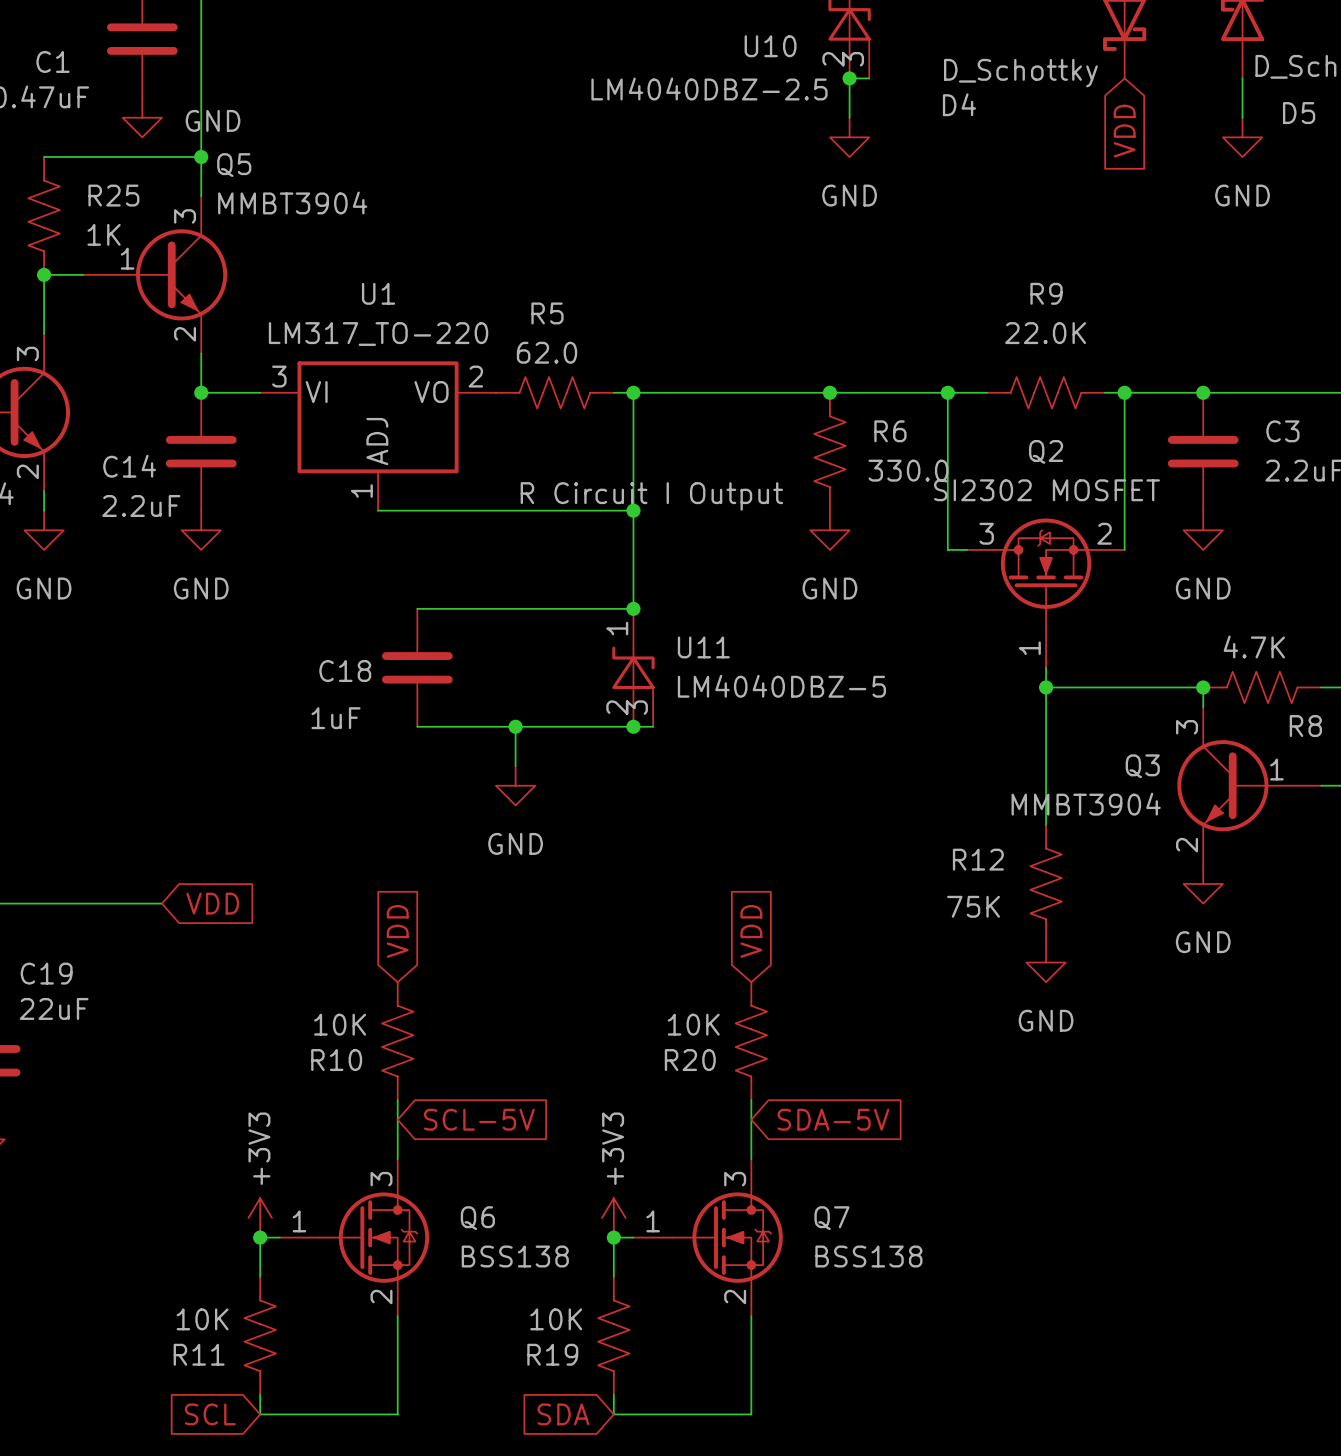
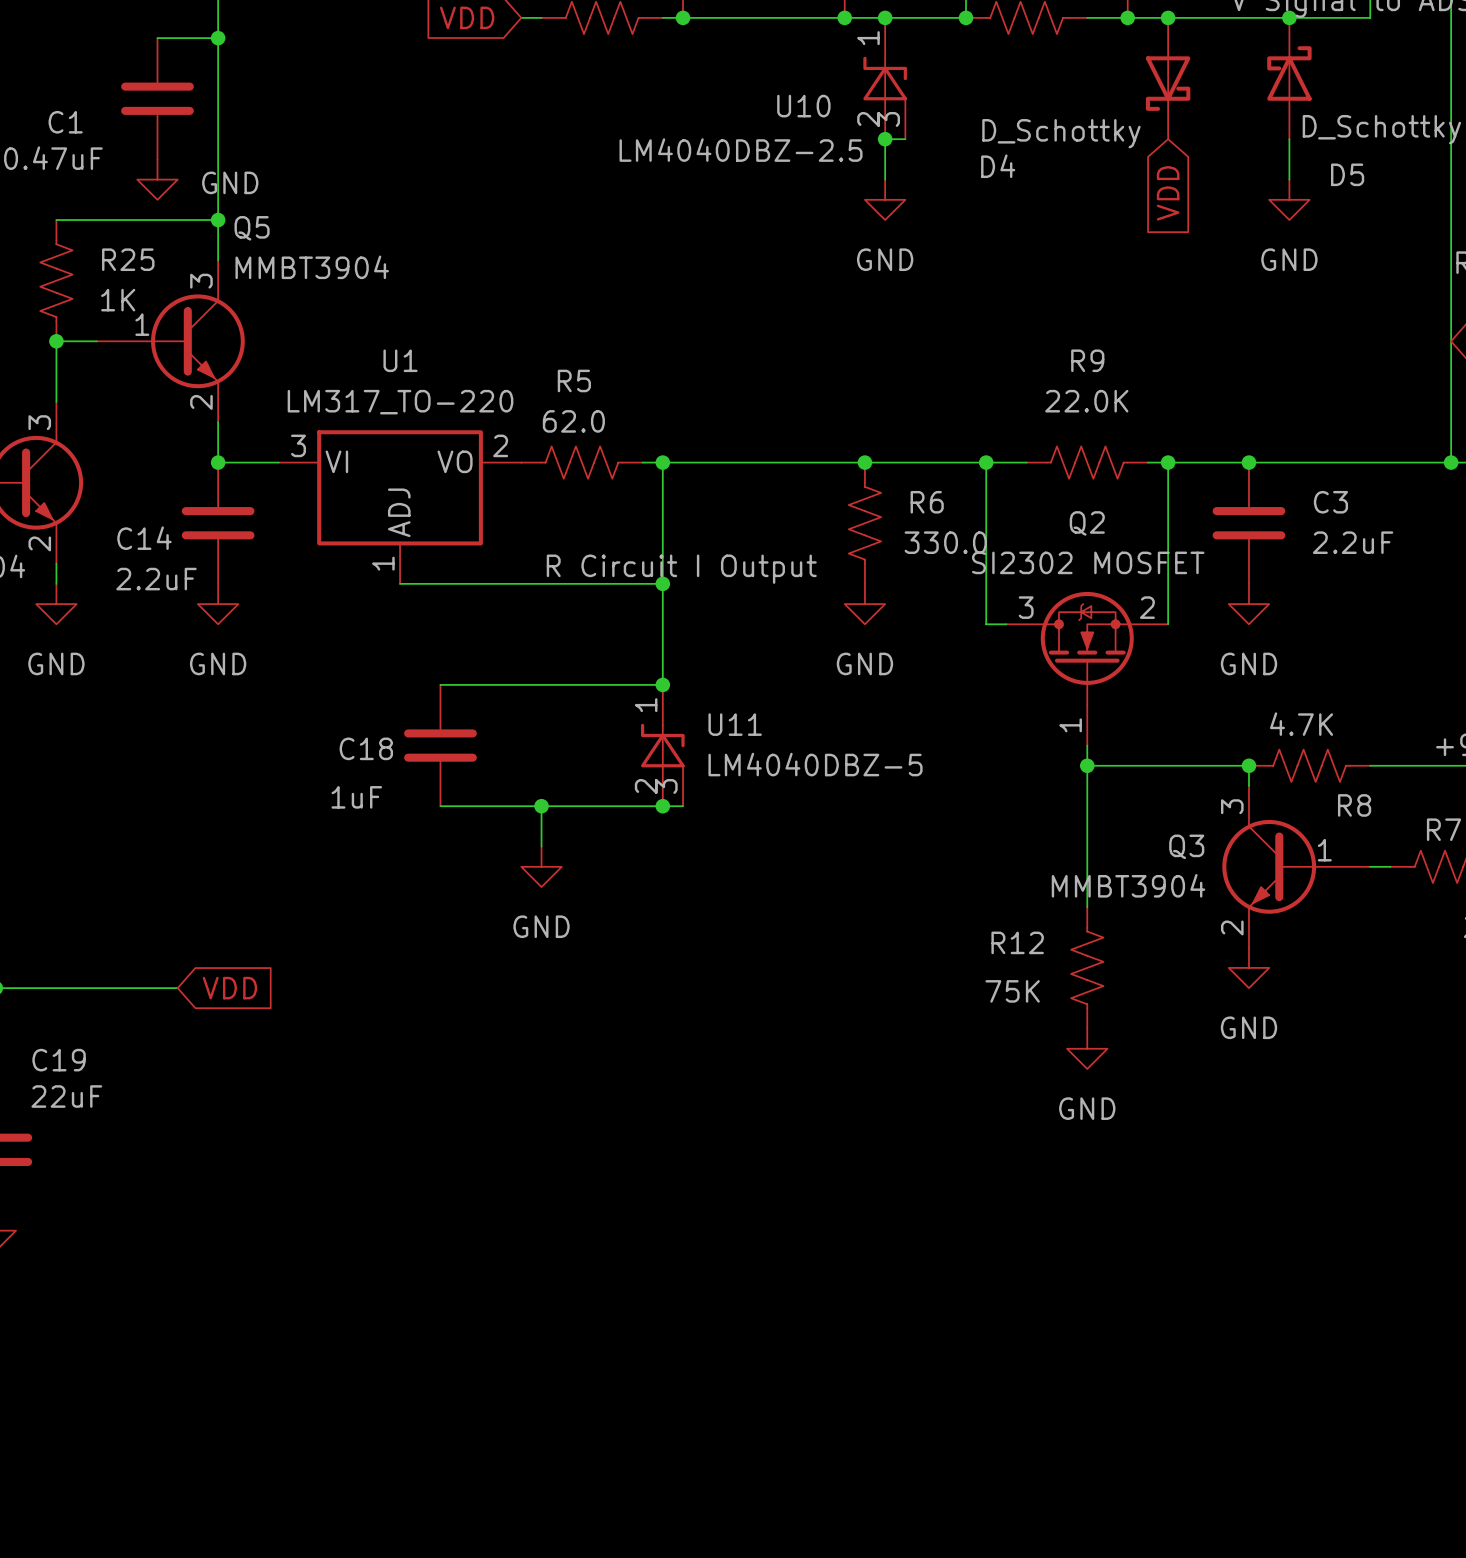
global label: VDD (397, 931) -> none
global label: VDD (751, 931) -> none
R10: 10K (397, 1041) -> none
R20: 10K (751, 1041) -> none
wire: (397, 1100) (397, 1159) -> none
wire: (751, 1100) (751, 1159) -> none
global label: SCL-5V (479, 1119) -> none
global label: SDA-5V (833, 1119) -> none
power symbol: +3V3 (260, 1217) -> none
power symbol: +3V3 (613, 1217) -> none
junction: (260, 1237) -> none
wire: (279, 1237) (260, 1237) (260, 1276) -> none
Q6: BSS138 (354, 1237) -> none
junction: (613, 1237) -> none
wire: (633, 1237) (613, 1237) (613, 1276) -> none
Q7: BSS138 (708, 1237) -> none
wire: (397, 1316) (397, 1414) (260, 1414) (260, 1394) -> none
wire: (751, 1316) (751, 1414) (613, 1414) (613, 1394) -> none
R11: 10K (260, 1335) -> none
R19: 10K (613, 1335) -> none
global label: SCL (210, 1414) -> none
global label: SDA (563, 1414) -> none

